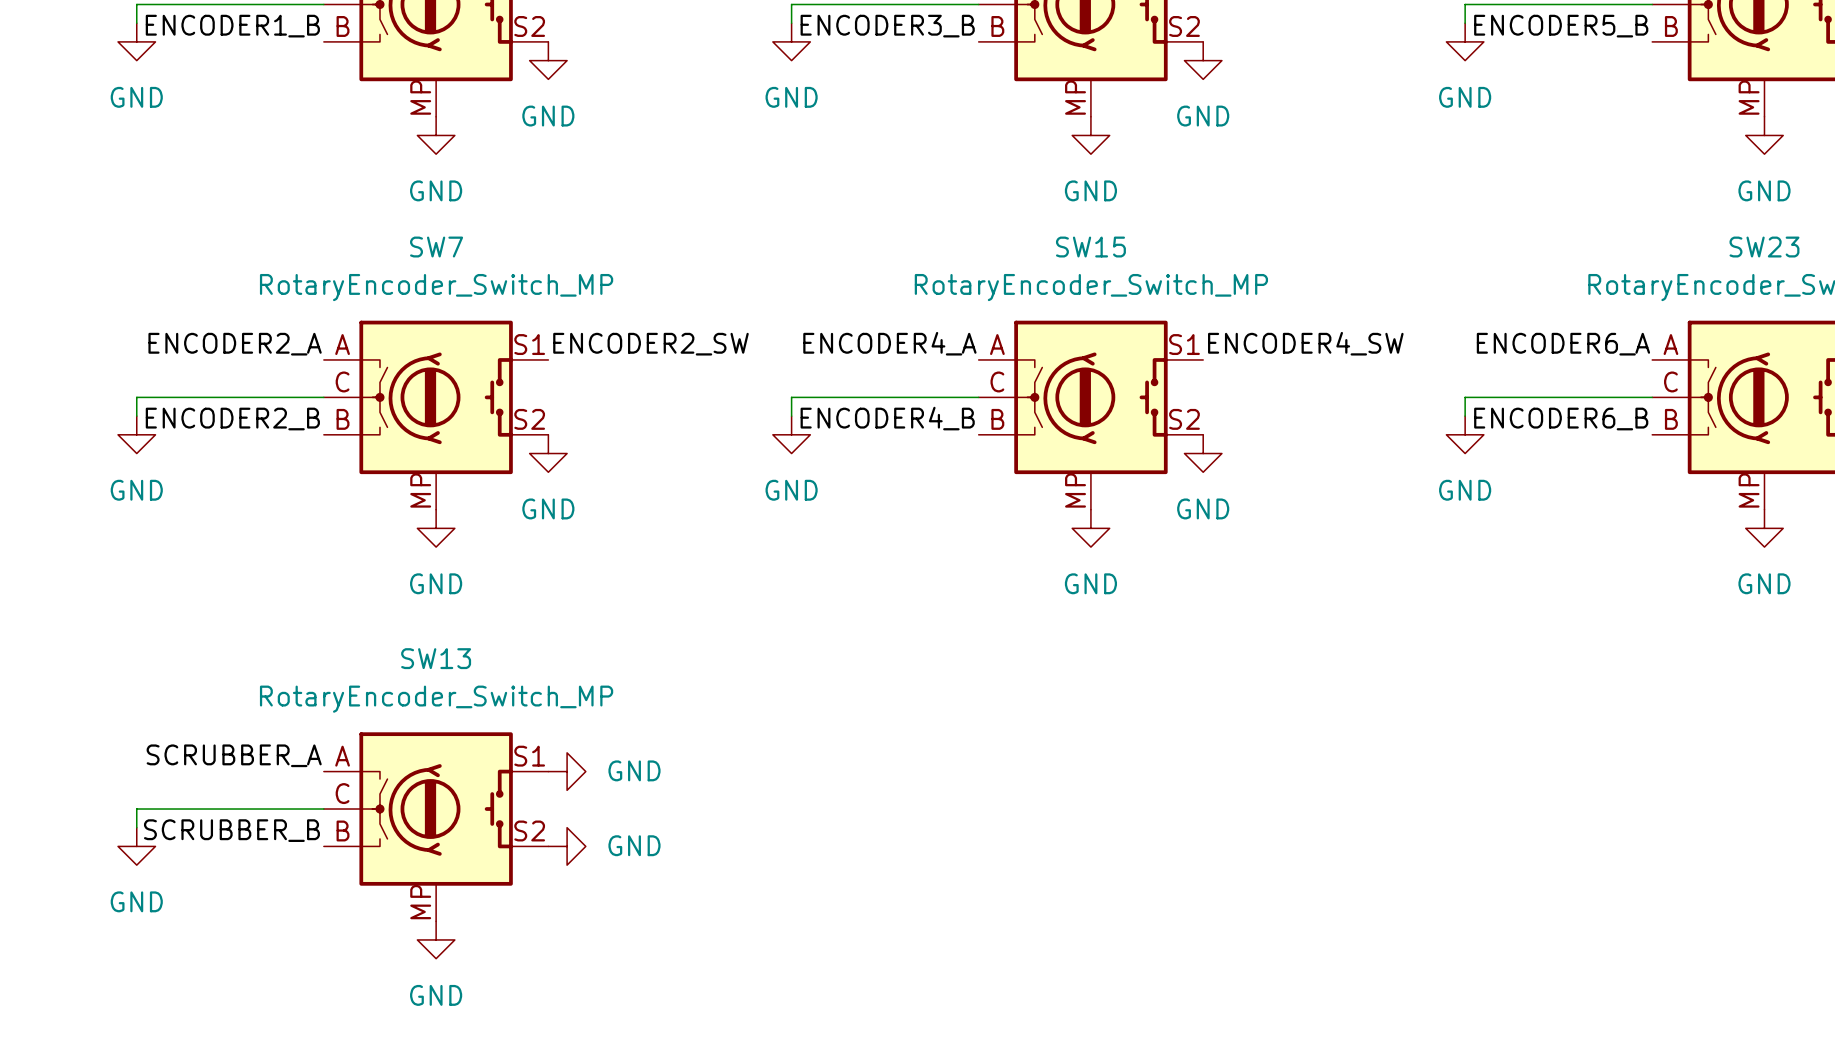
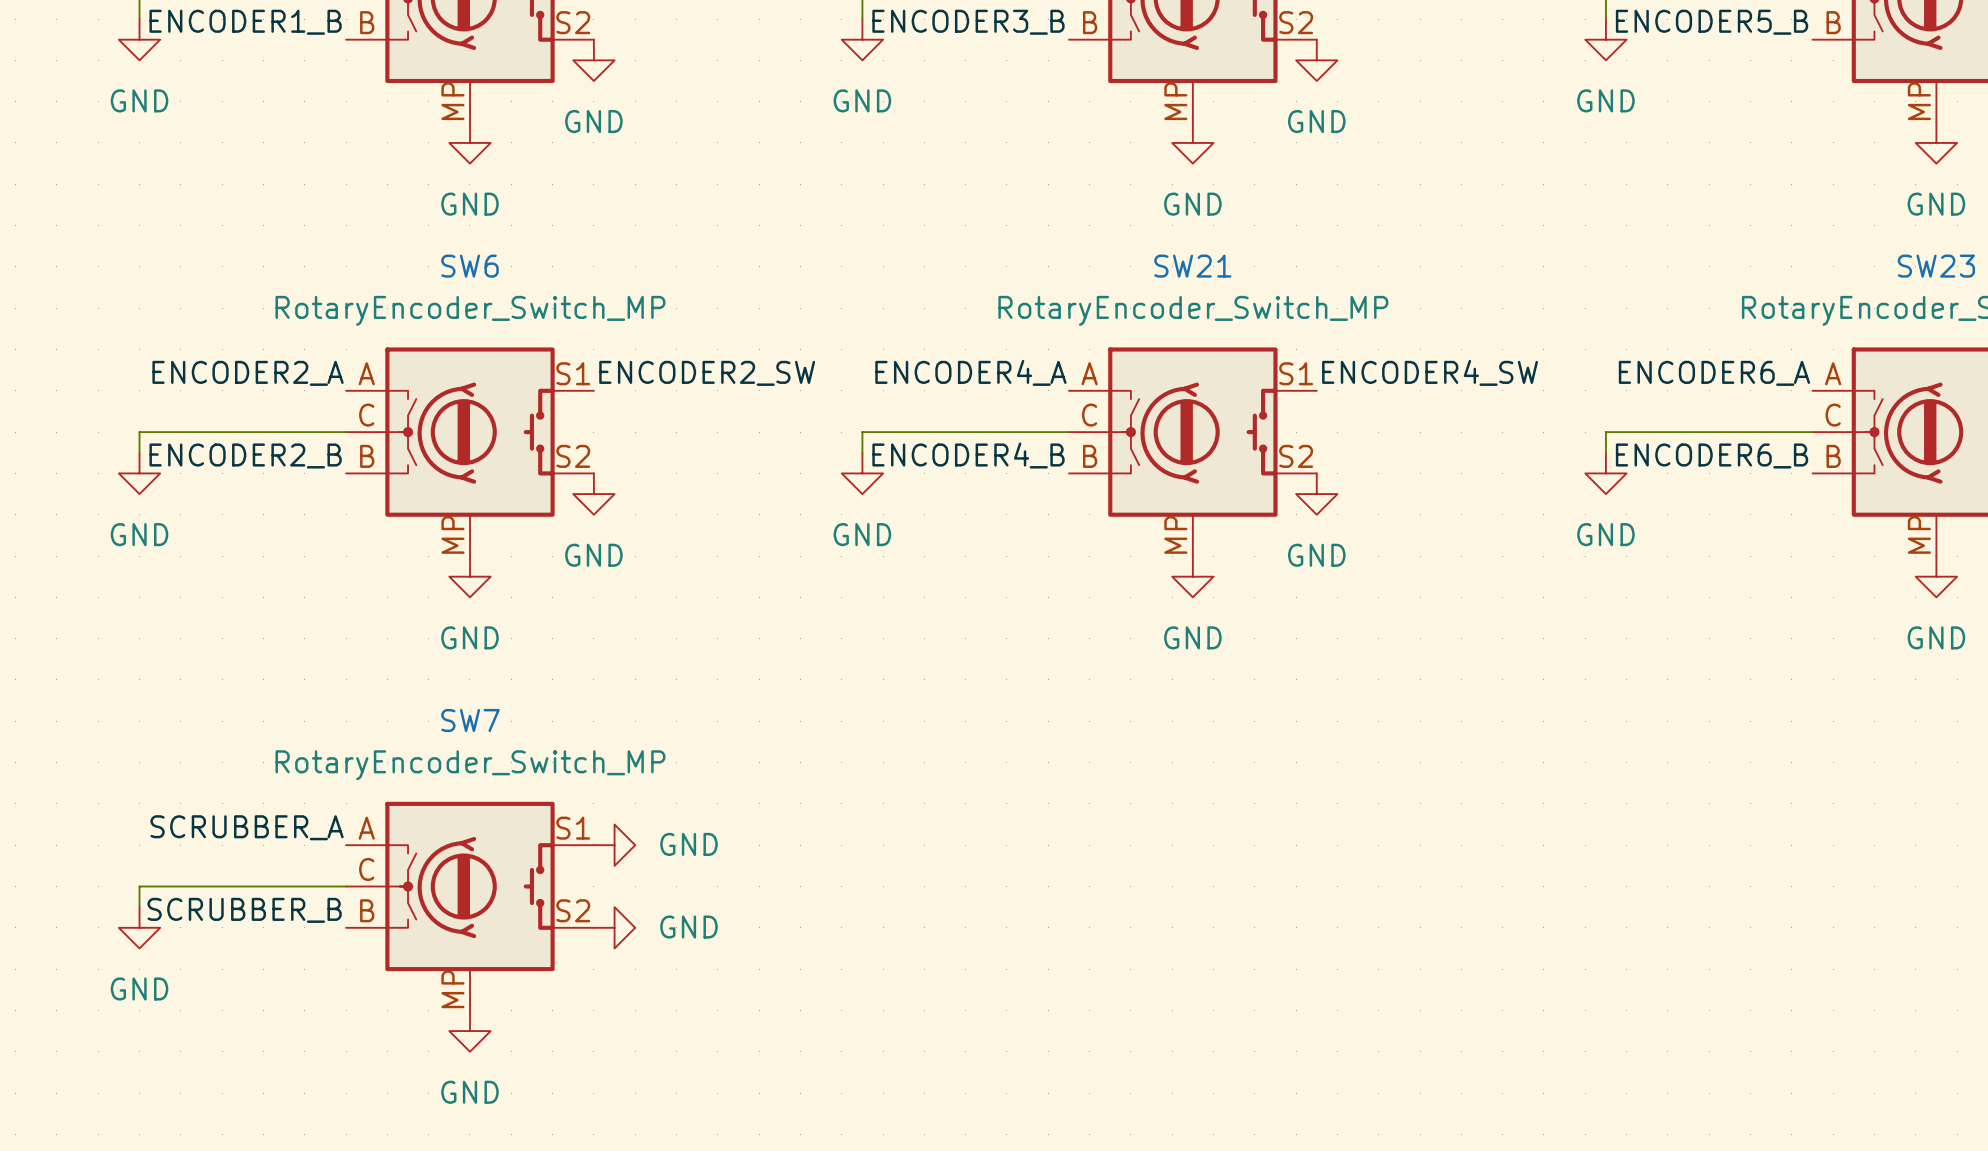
SW7 name: SW7 (436, 247) -> SW6 (469, 266)
SW15 name: SW15 (1090, 247) -> SW21 (1192, 266)
SW13 name: SW13 (436, 658) -> SW7 (470, 720)

